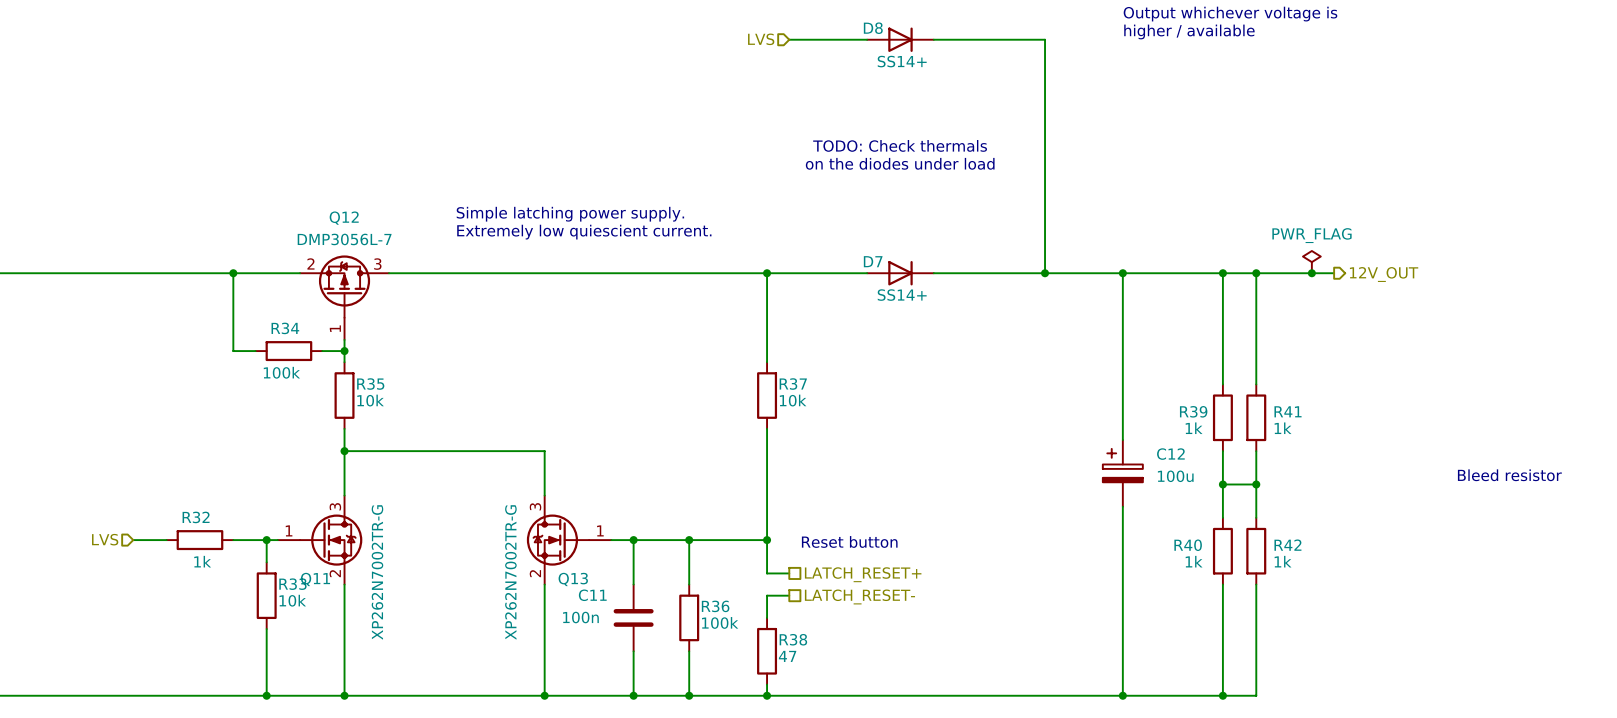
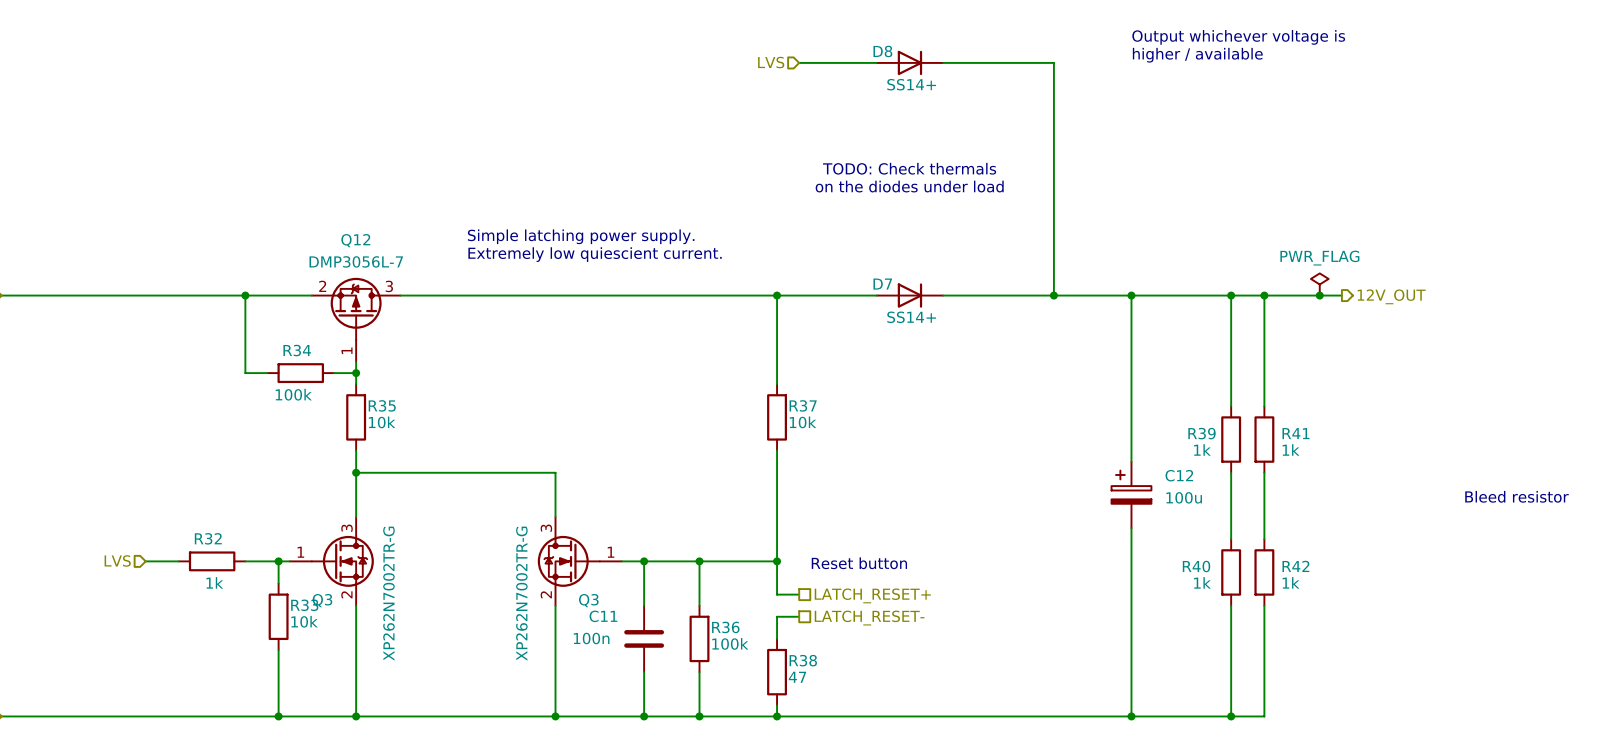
wire: (1222, 484) (1256, 484) -> none
junction: (1222, 484) -> none
junction: (1256, 484) -> none
Q11 name: Q11 (315, 579) -> Q3 (322, 600)
Q13 name: Q13 (573, 579) -> Q3 (588, 600)

